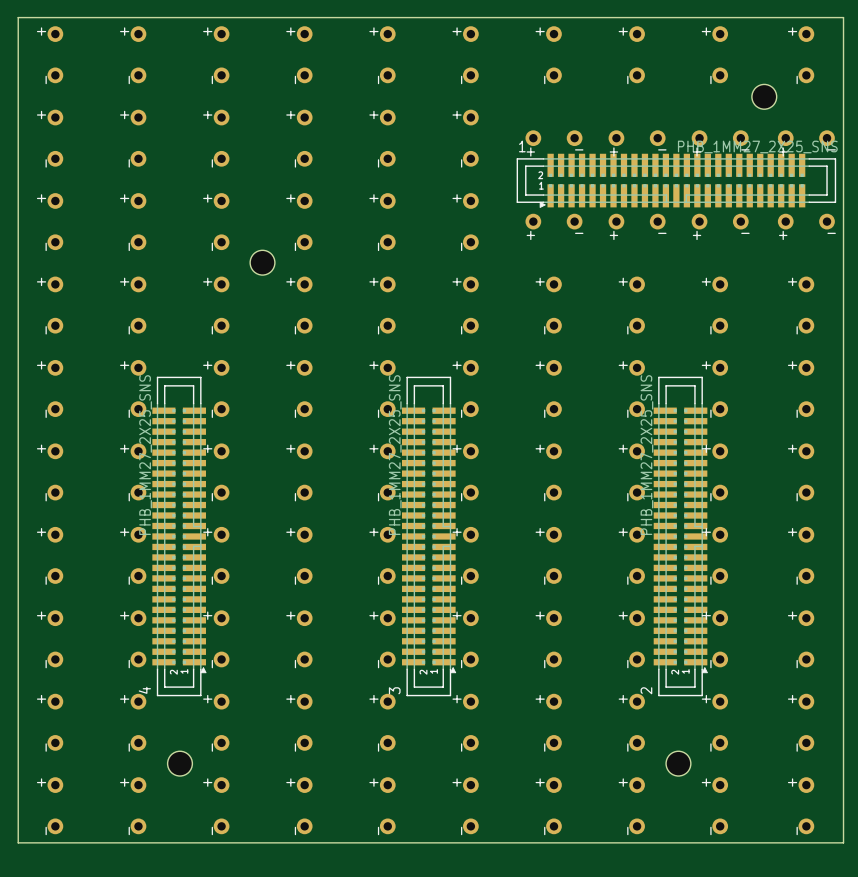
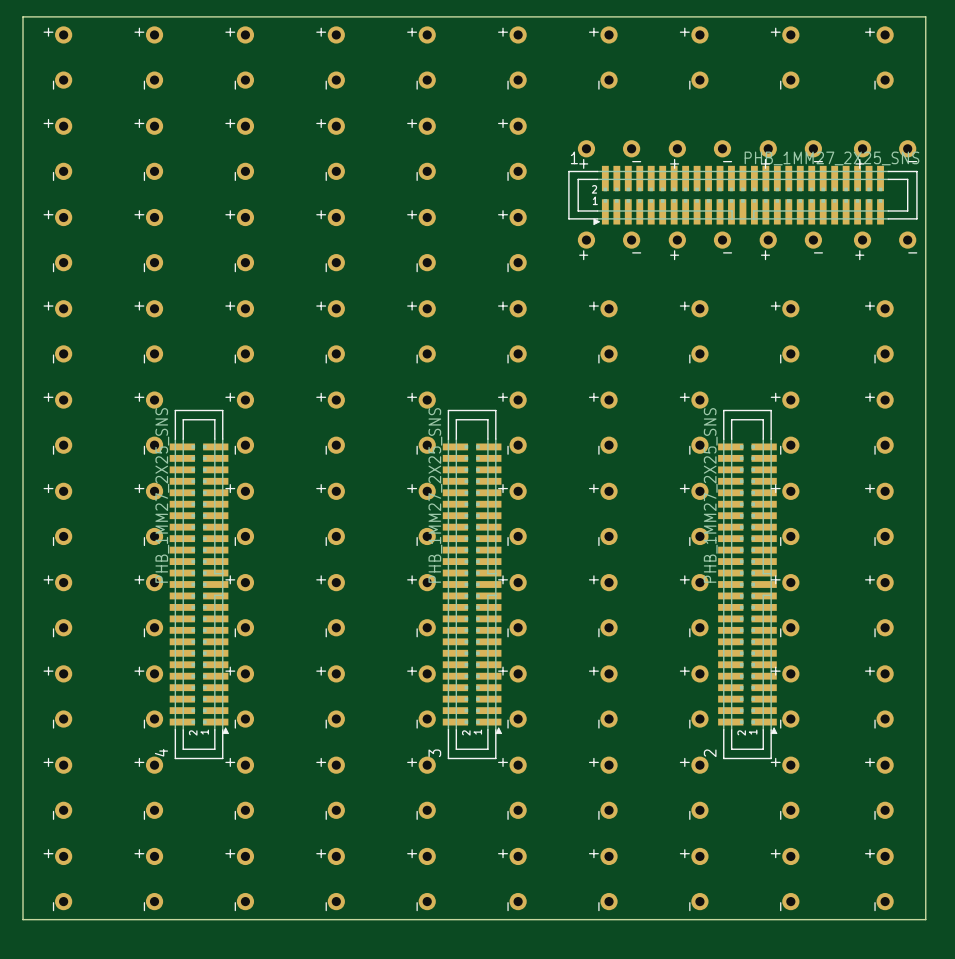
hole: (764, 96) -> none
hole: (262, 262) -> none
hole: (179, 763) -> none
hole: (678, 763) -> none

